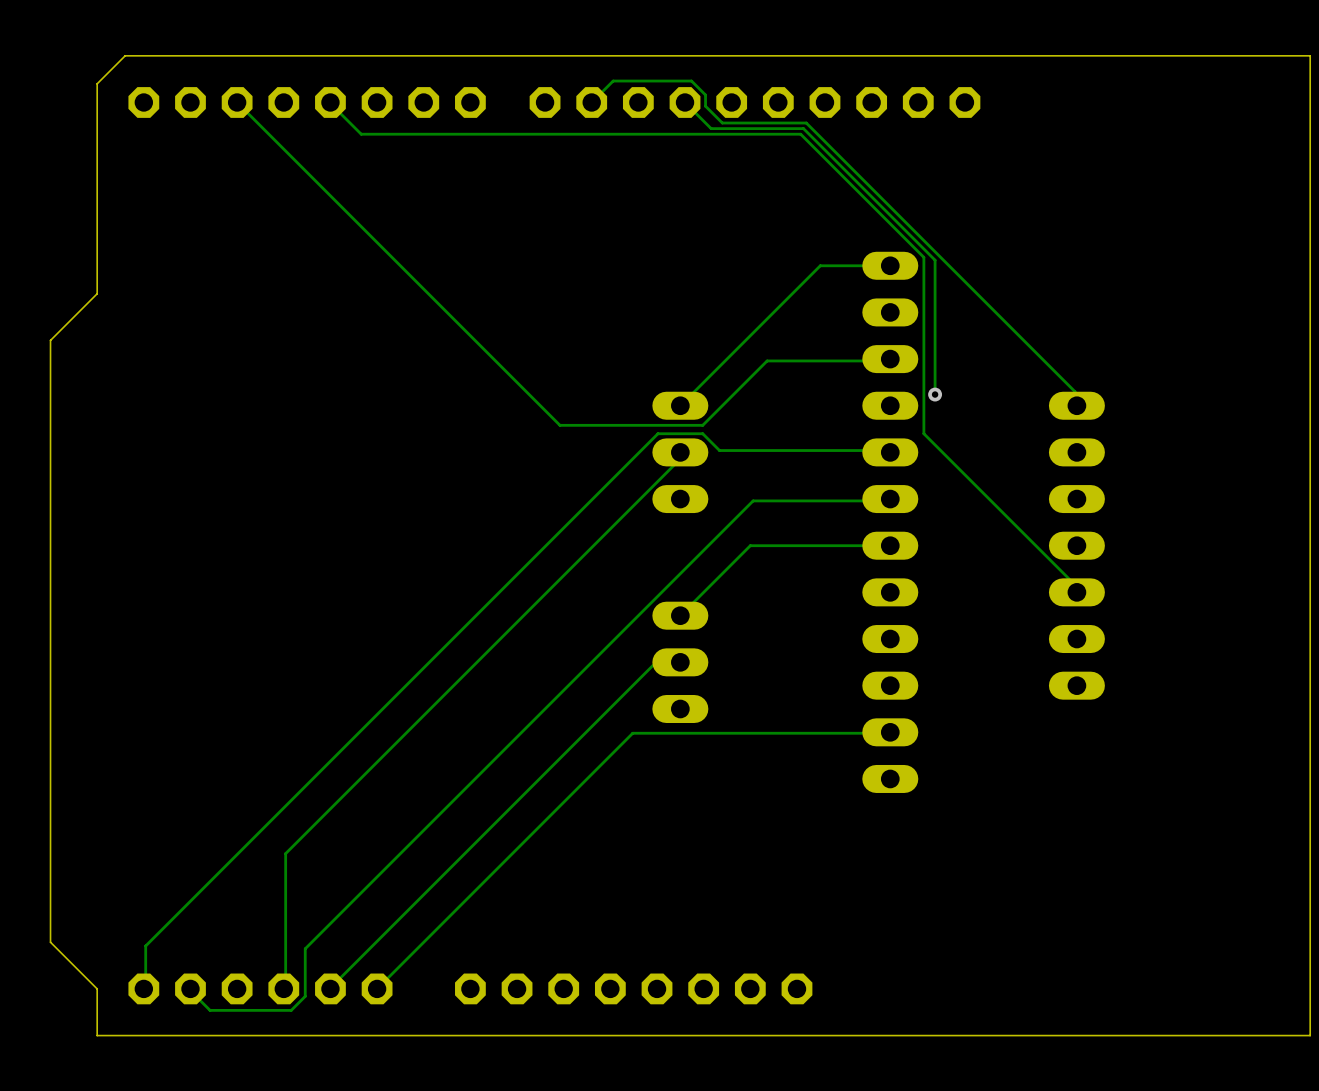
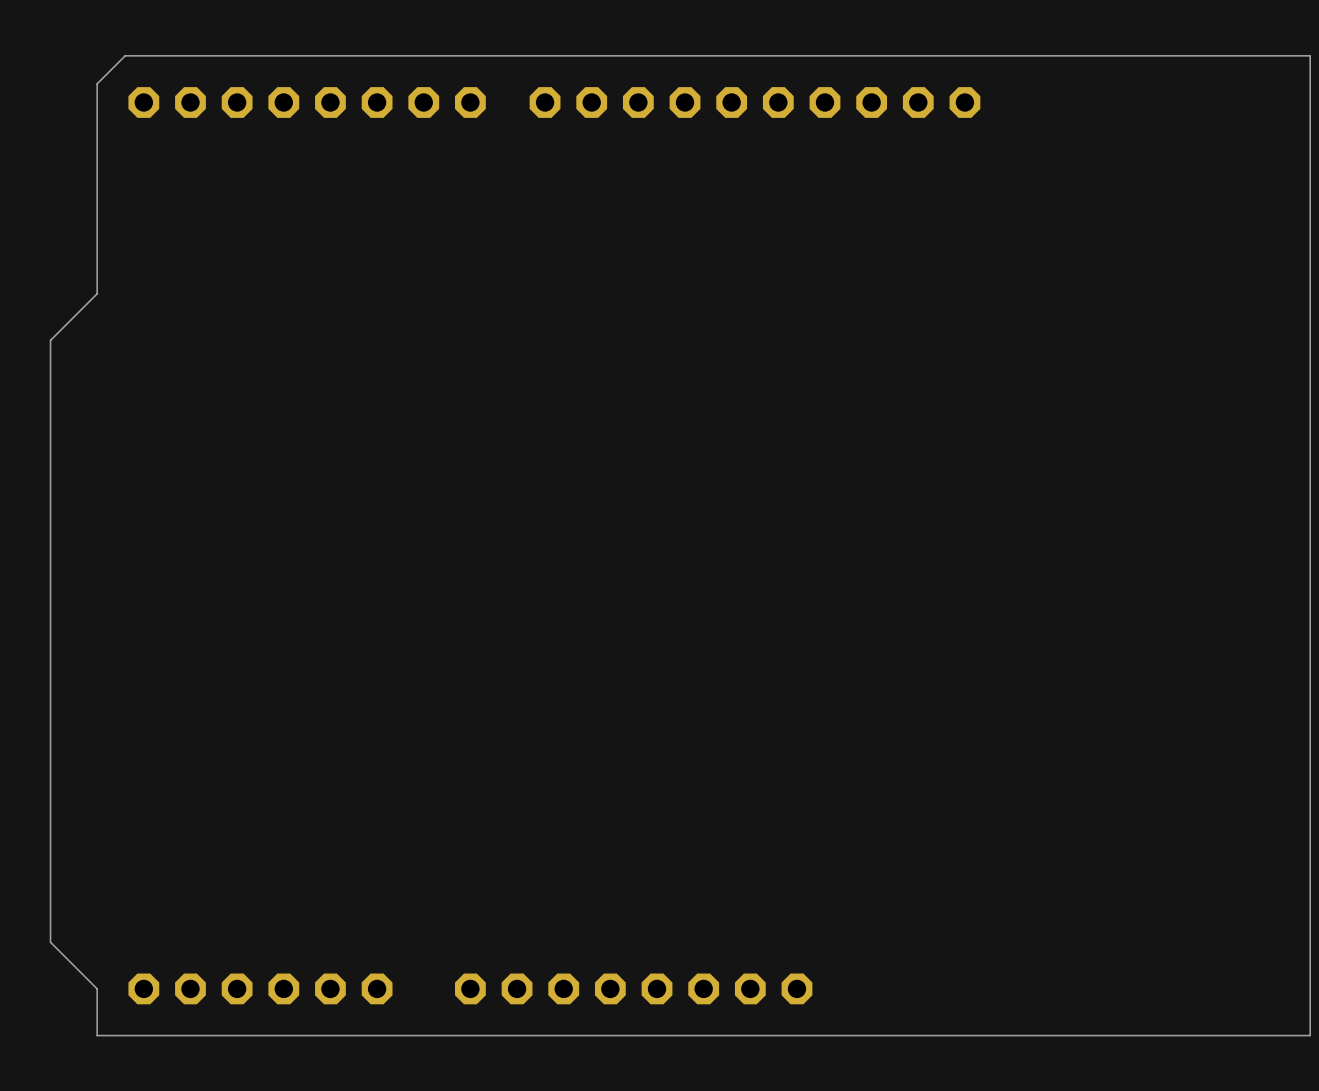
track: (237, 102) (559, 425) (702, 425) (767, 360) (890, 360) (890, 359) -> none
track: (330, 102) (361, 134) (800, 134) (923, 257) (923, 433) (1075, 584) (1076, 592) -> none
track: (591, 102) (613, 81) (691, 81) (705, 95) (705, 106) (722, 123) (806, 123) (1075, 391) (1075, 405) (1076, 405) -> none
track: (685, 102) (711, 128) (803, 128) (935, 260) (935, 394) -> none
track: (890, 265) (820, 265) (680, 405) -> none
via: (935, 394) -> none
track: (680, 452) (680, 458) (285, 853) (285, 987) (283, 988) -> none
part: (680, 452) -> none
track: (890, 452) (890, 450) (719, 450) (702, 433) (657, 433) (145, 946) (145, 987) (143, 988) -> none
track: (890, 499) (890, 500) (753, 500) (305, 948) (305, 996) (291, 1010) (210, 1010) (190, 988) -> none
part: (890, 522) -> none
track: (890, 545) (750, 545) (680, 615) -> none
part: (1076, 545) -> none
track: (680, 662) (655, 663) (330, 988) -> none
part: (680, 662) -> none
track: (890, 732) (632, 733) (377, 988) -> none

